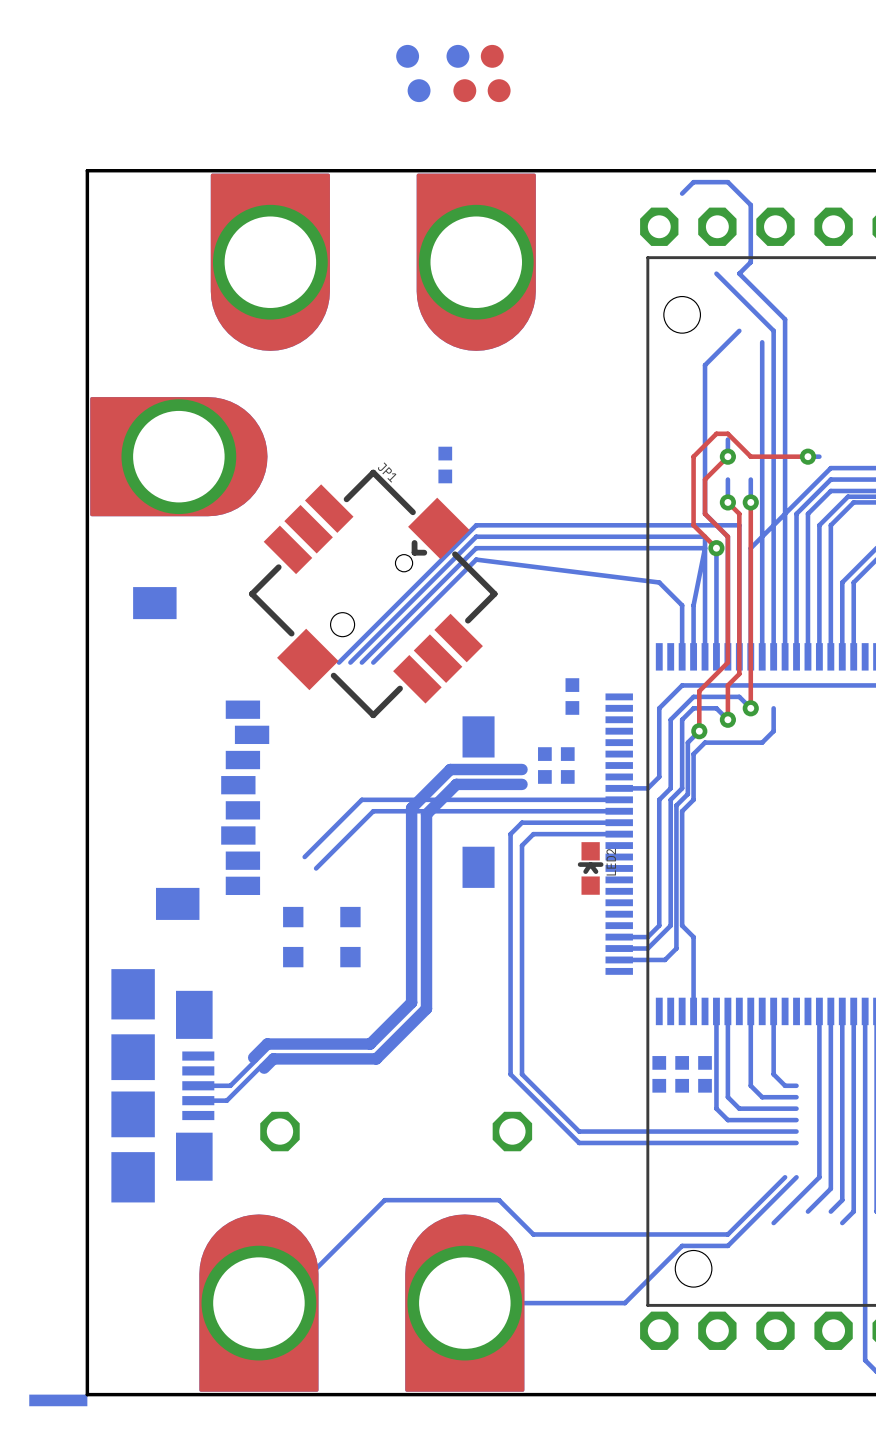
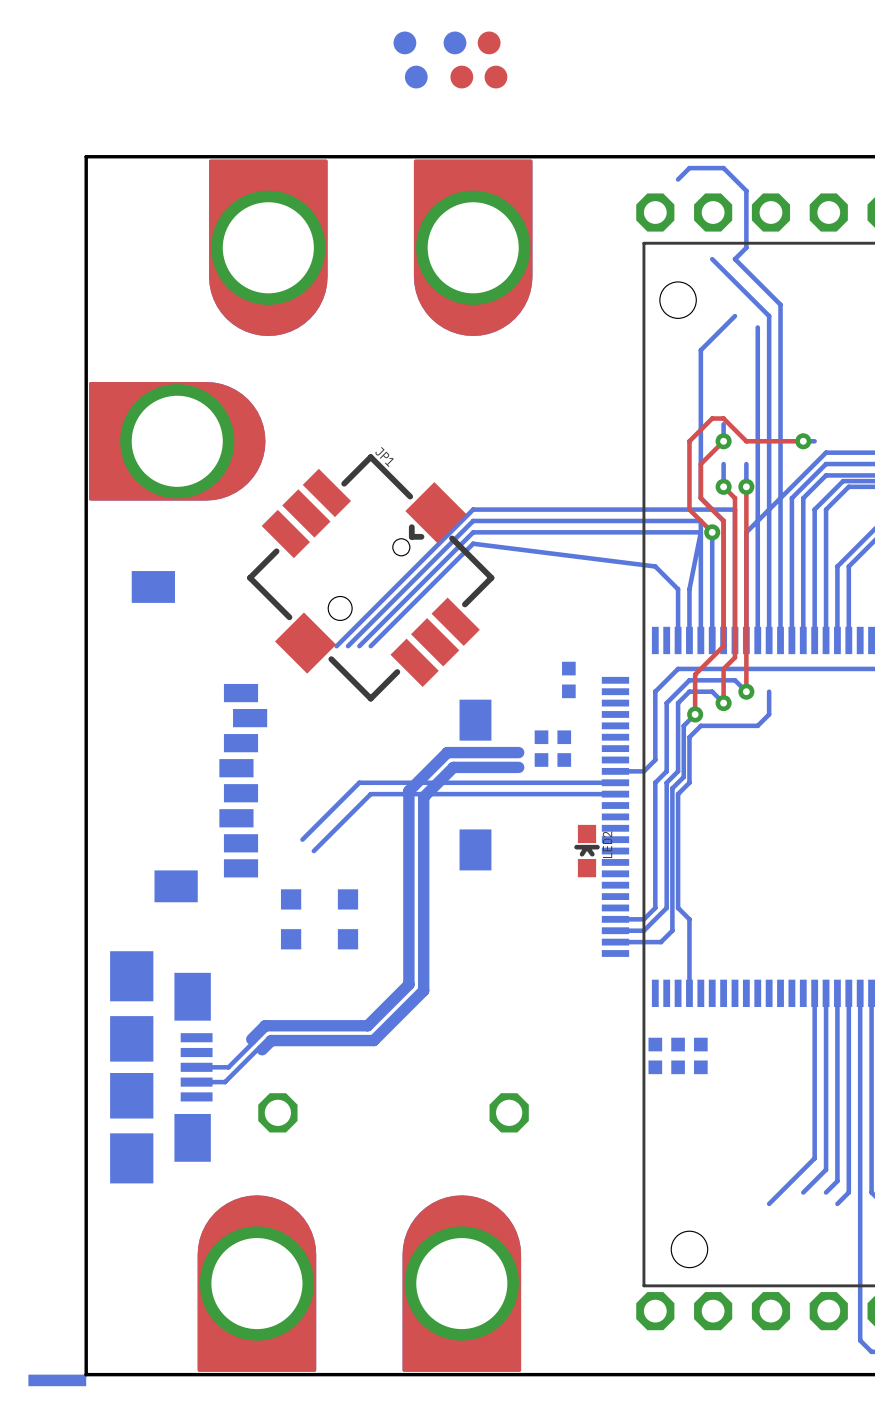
part: (445, 465) -> none
bottom track: (619, 822) (522, 822) (510, 834) (510, 1074) (579, 1142) (796, 1142) -> none
bottom track: (619, 834) (533, 834) (522, 845) (522, 1074) (579, 1131) (796, 1131) -> none
bottom track: (716, 1011) (716, 1108) (727, 1120) (796, 1120) -> none
bottom track: (727, 1011) (727, 1097) (739, 1108) (796, 1108) -> none
bottom track: (750, 1011) (750, 1085) (762, 1097) (796, 1097) -> none
bottom track: (773, 1011) (773, 1074) (785, 1085) (796, 1085) -> none
bottom track: (785, 1177) (727, 1234) (533, 1234) (499, 1200) (384, 1200) (281, 1303) (258, 1303) -> none
bottom track: (796, 1177) (727, 1245) (682, 1245) (624, 1303) (464, 1303) -> none

